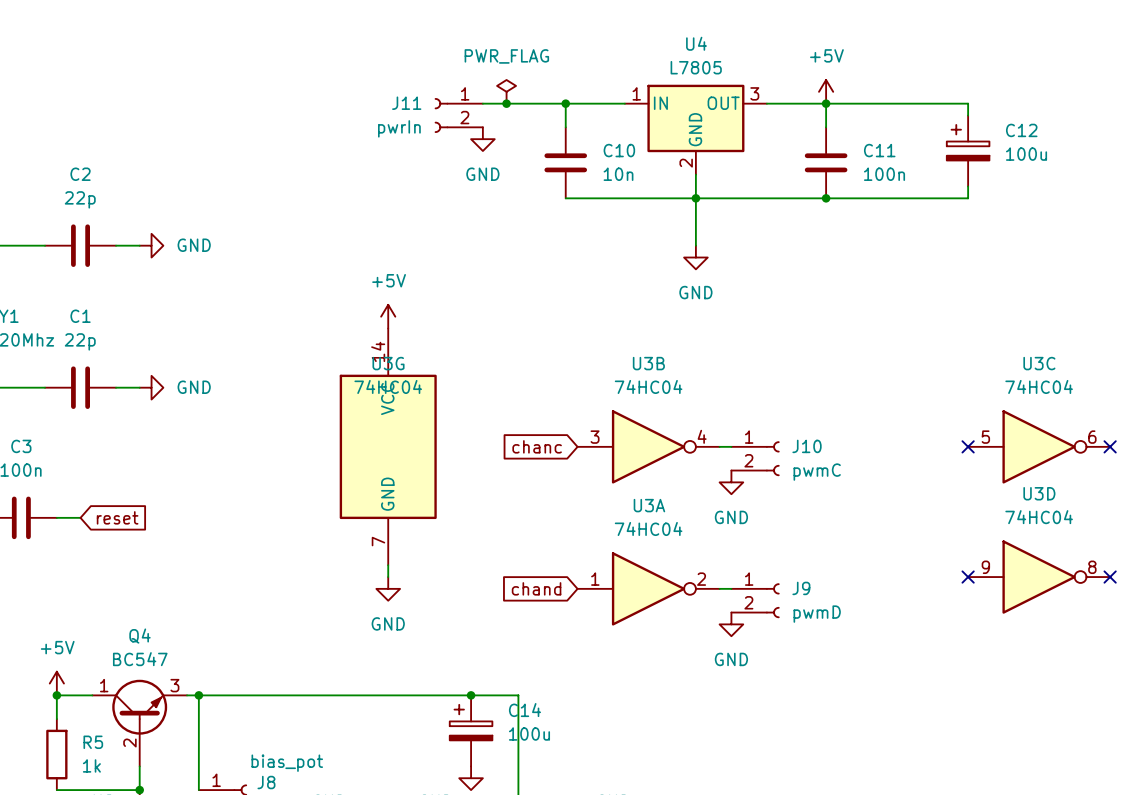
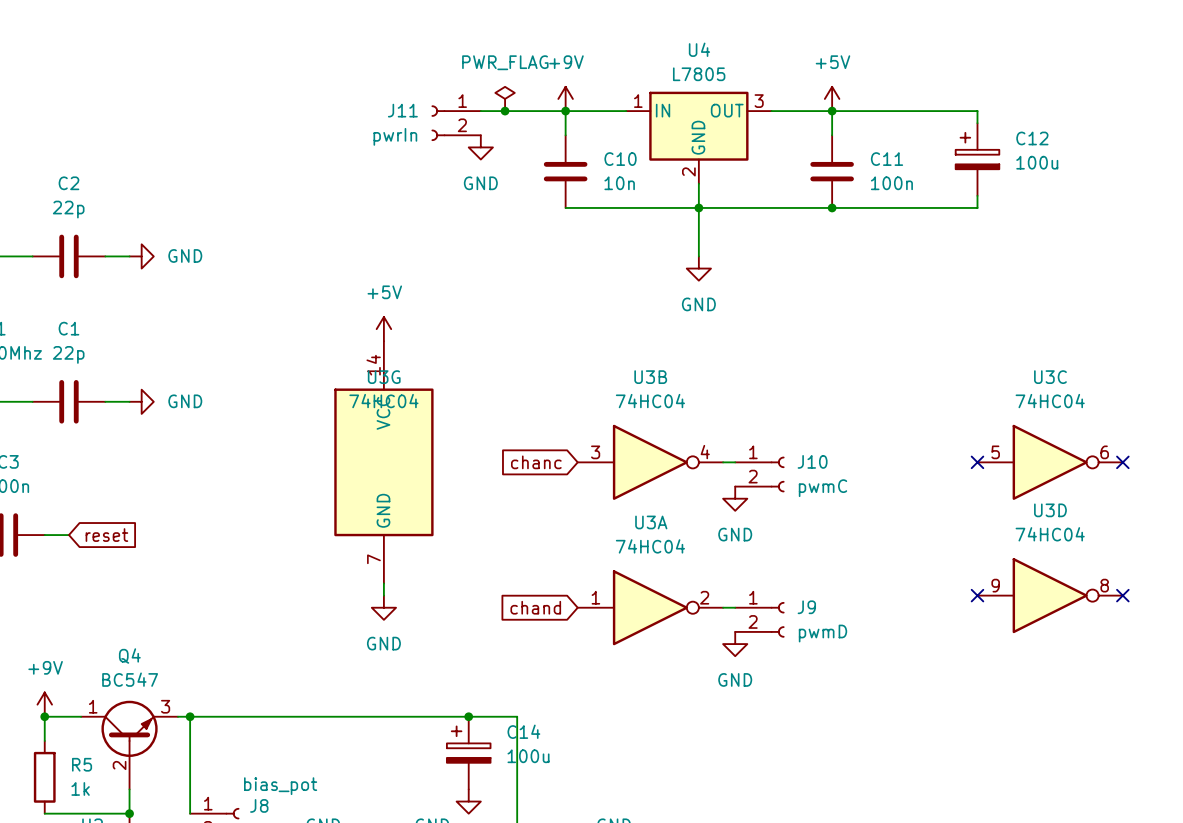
power symbol: none -> +9V (565, 98)
power symbol: +5V (56, 683) -> +9V (44, 704)

